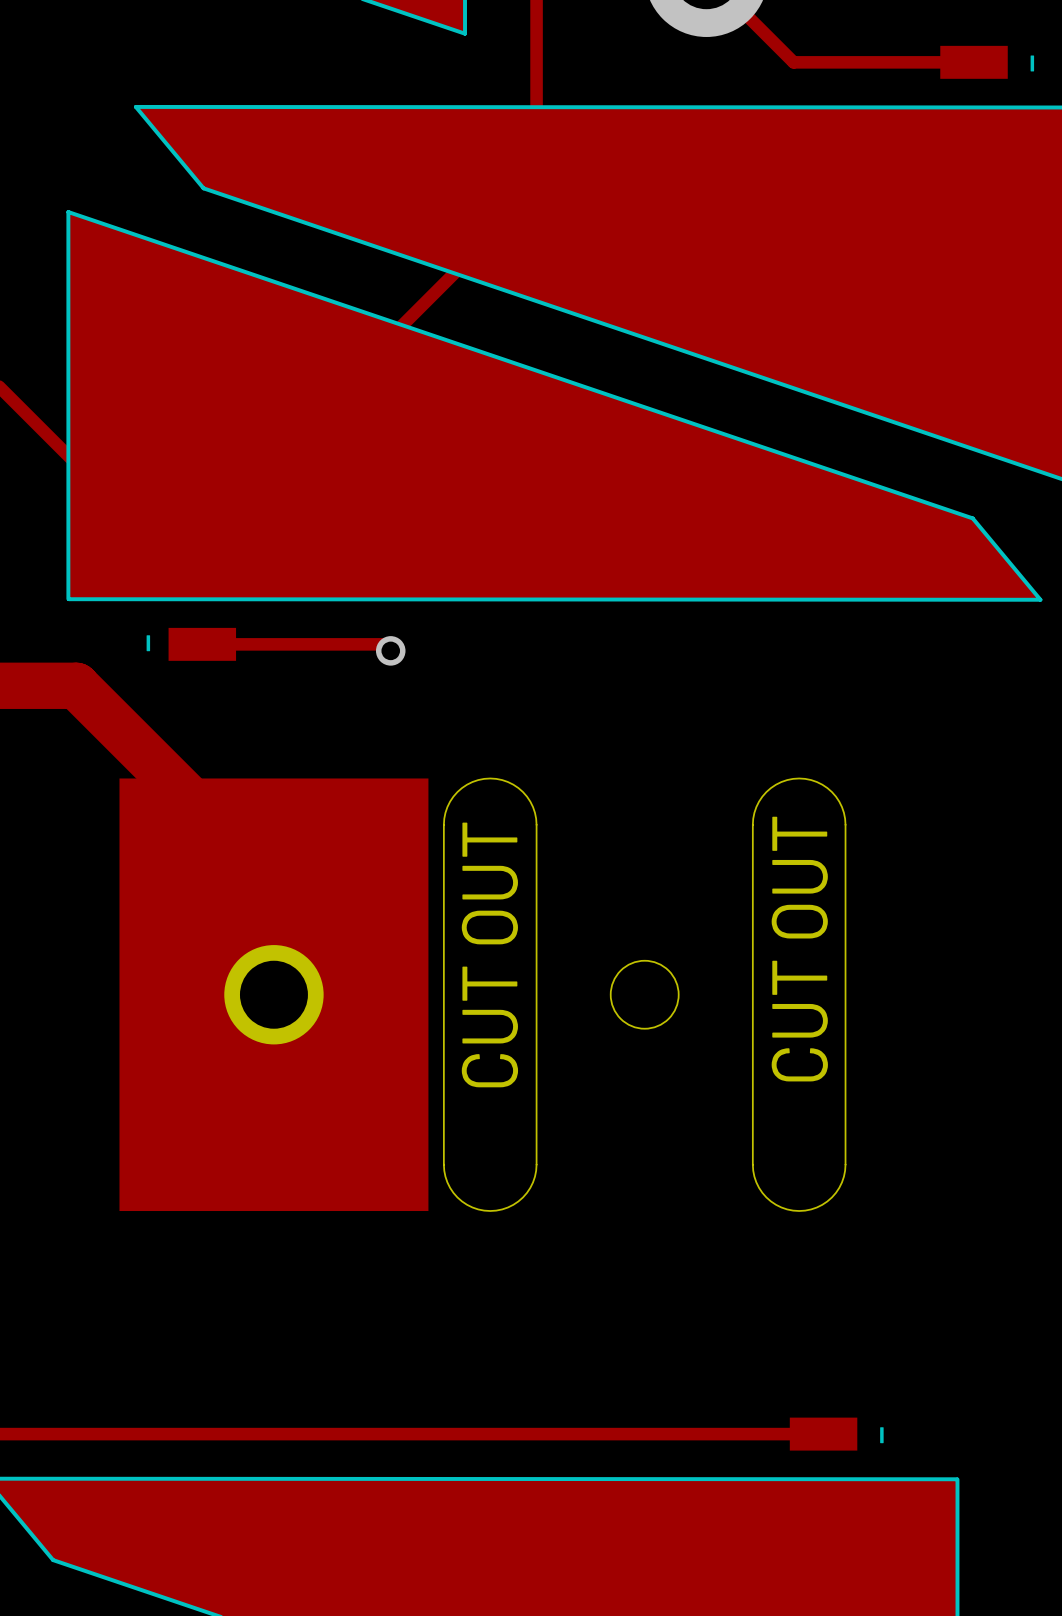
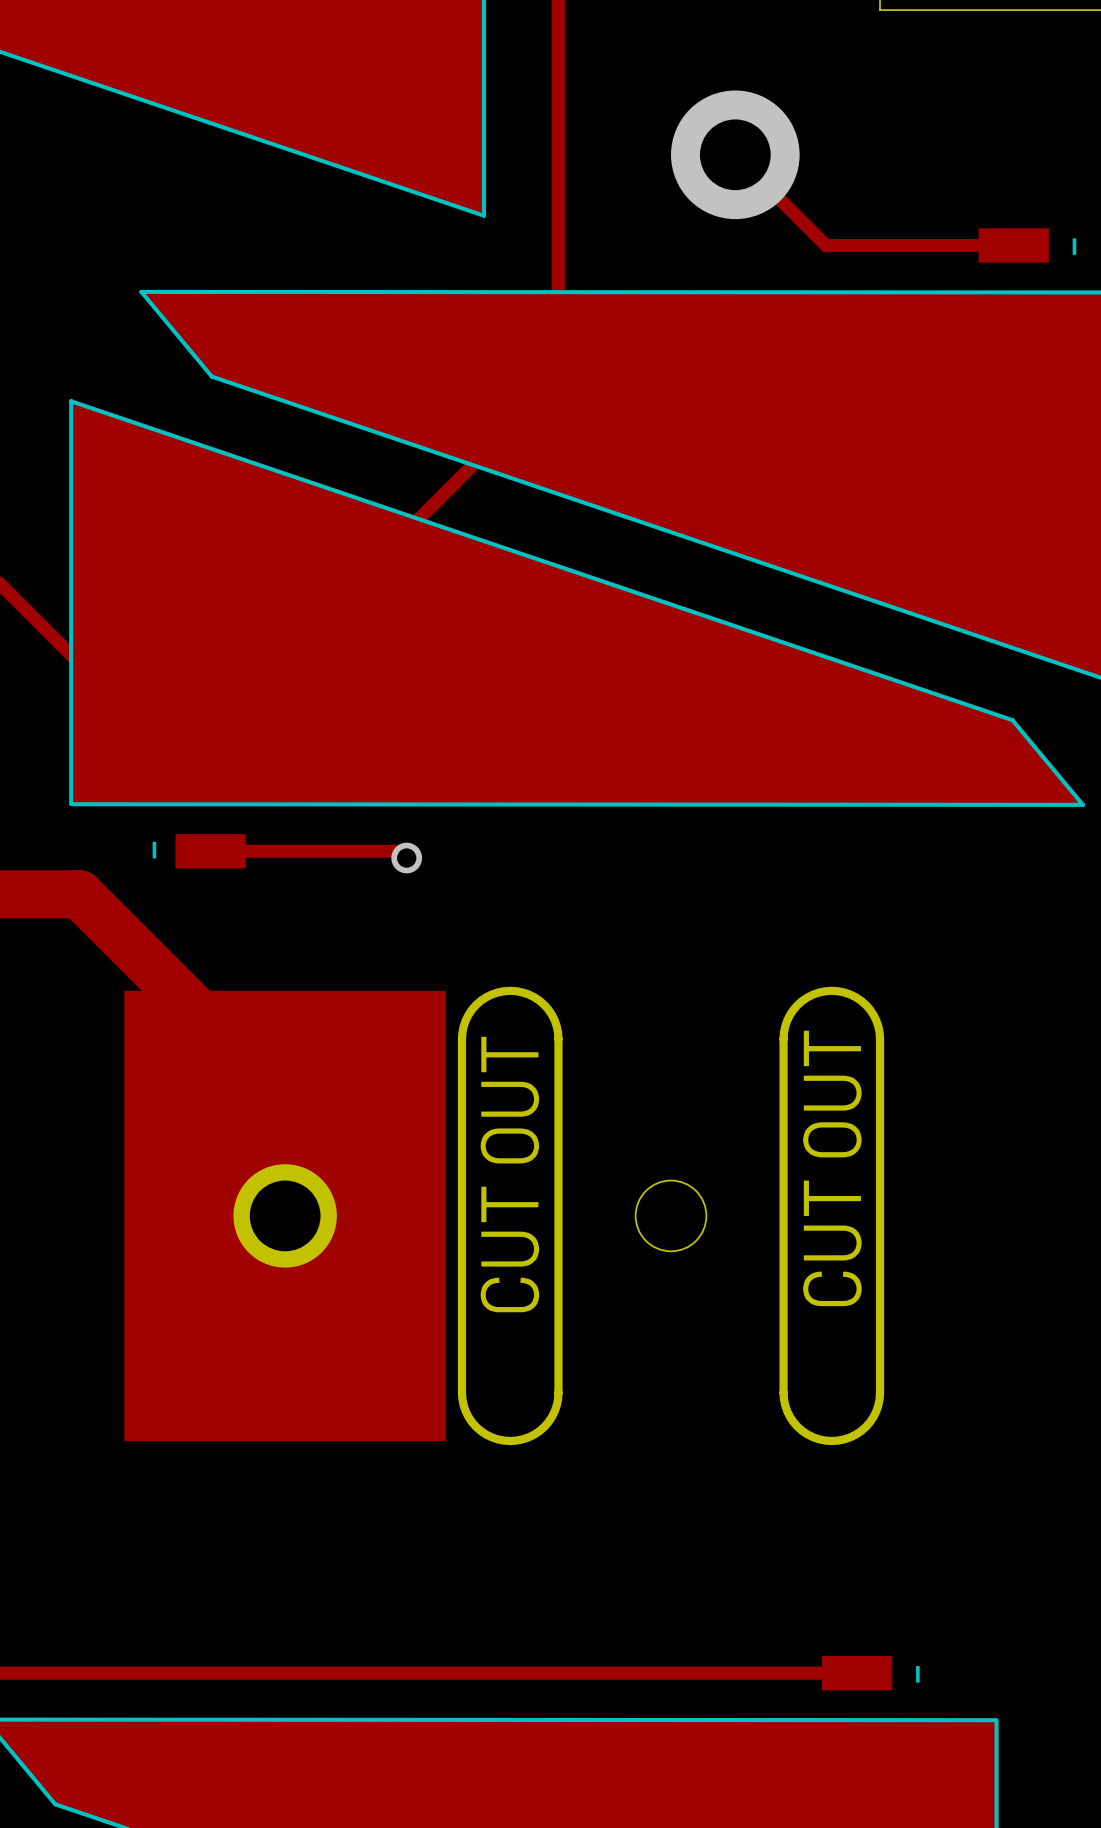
board edge width: thin (443, 824) (444, 1170) (450, 1187) (462, 1201) (478, 1209) (496, 1210) (507, 1207) (522, 1197) (533, 1182) (536, 1170) (536, 818) (530, 801) (518, 788) (502, 780) (484, 778) (472, 782) (457, 792) (447, 807) (443, 824) -> thick (462, 1039) (462, 1399) (468, 1416) (480, 1431) (497, 1439) (516, 1440) (528, 1437) (544, 1426) (554, 1411) (558, 1399) (558, 1032) (552, 1014) (539, 1000) (522, 992) (503, 991) (491, 994) (476, 1004) (465, 1020) (462, 1039)
board edge width: thin (752, 824) (753, 1170) (759, 1187) (770, 1201) (787, 1209) (805, 1210) (816, 1207) (831, 1197) (841, 1182) (845, 1170) (845, 818) (839, 801) (827, 788) (811, 780) (793, 778) (781, 782) (766, 792) (756, 807) (752, 824) -> thick (783, 1039) (783, 1399) (790, 1416) (802, 1431) (819, 1439) (838, 1440) (850, 1437) (865, 1426) (876, 1411) (879, 1399) (879, 1032) (873, 1014) (861, 1000) (844, 992) (825, 991) (813, 994) (797, 1004) (787, 1020) (783, 1039)

